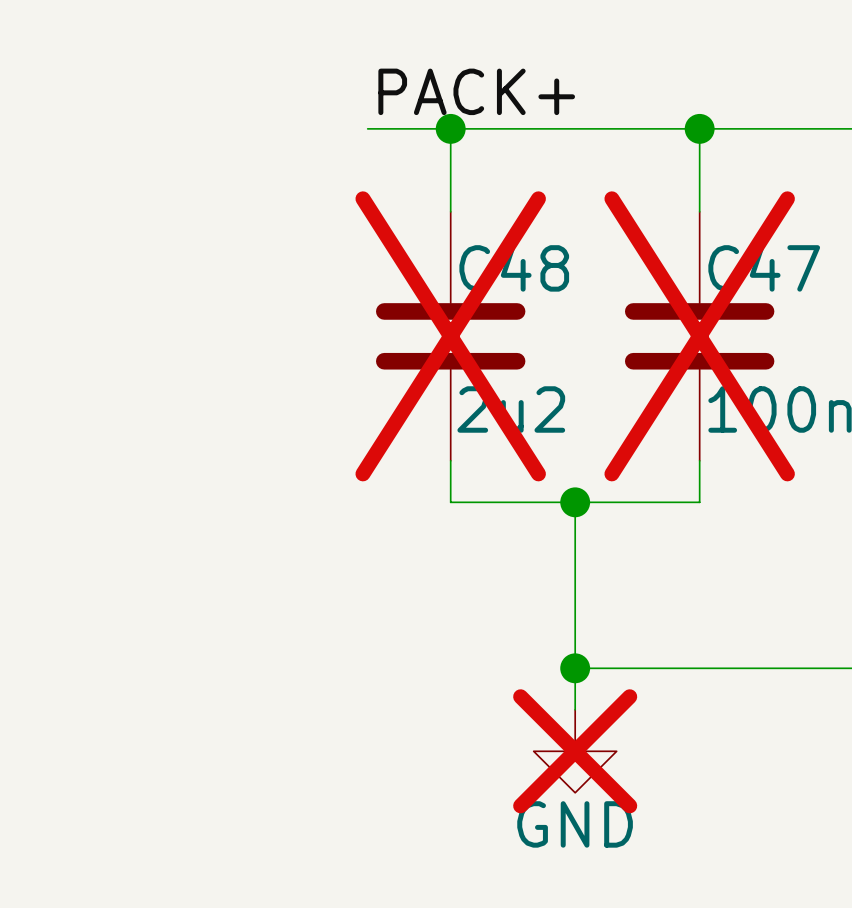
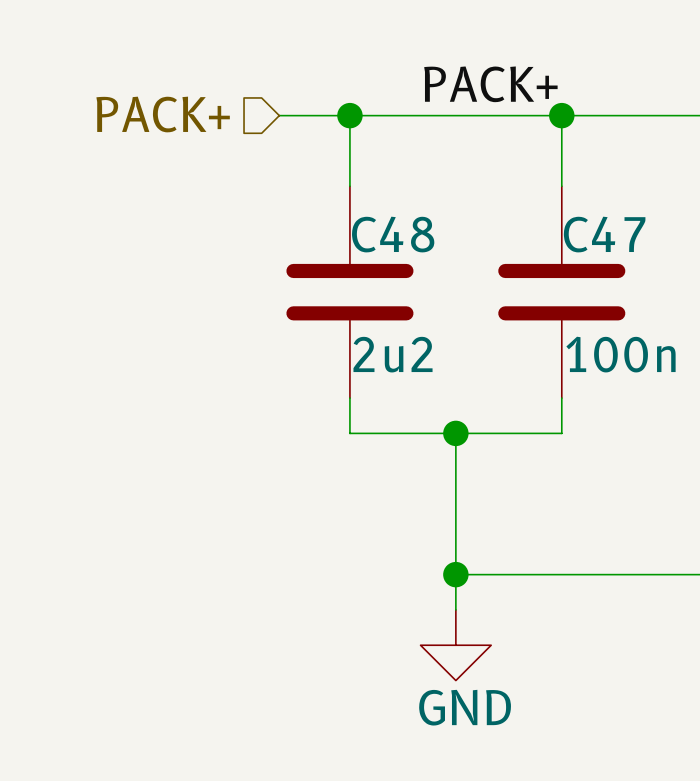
label position: PACK+ (476, 91) -> PACK+ (490, 84)
hierarchical label: none -> PACK+ (163, 114)
C48 do-not-place cross: (450, 336) -> none
C47 do-not-place cross: (699, 336) -> none
power symbol do-not-place cross: (575, 751) -> none

